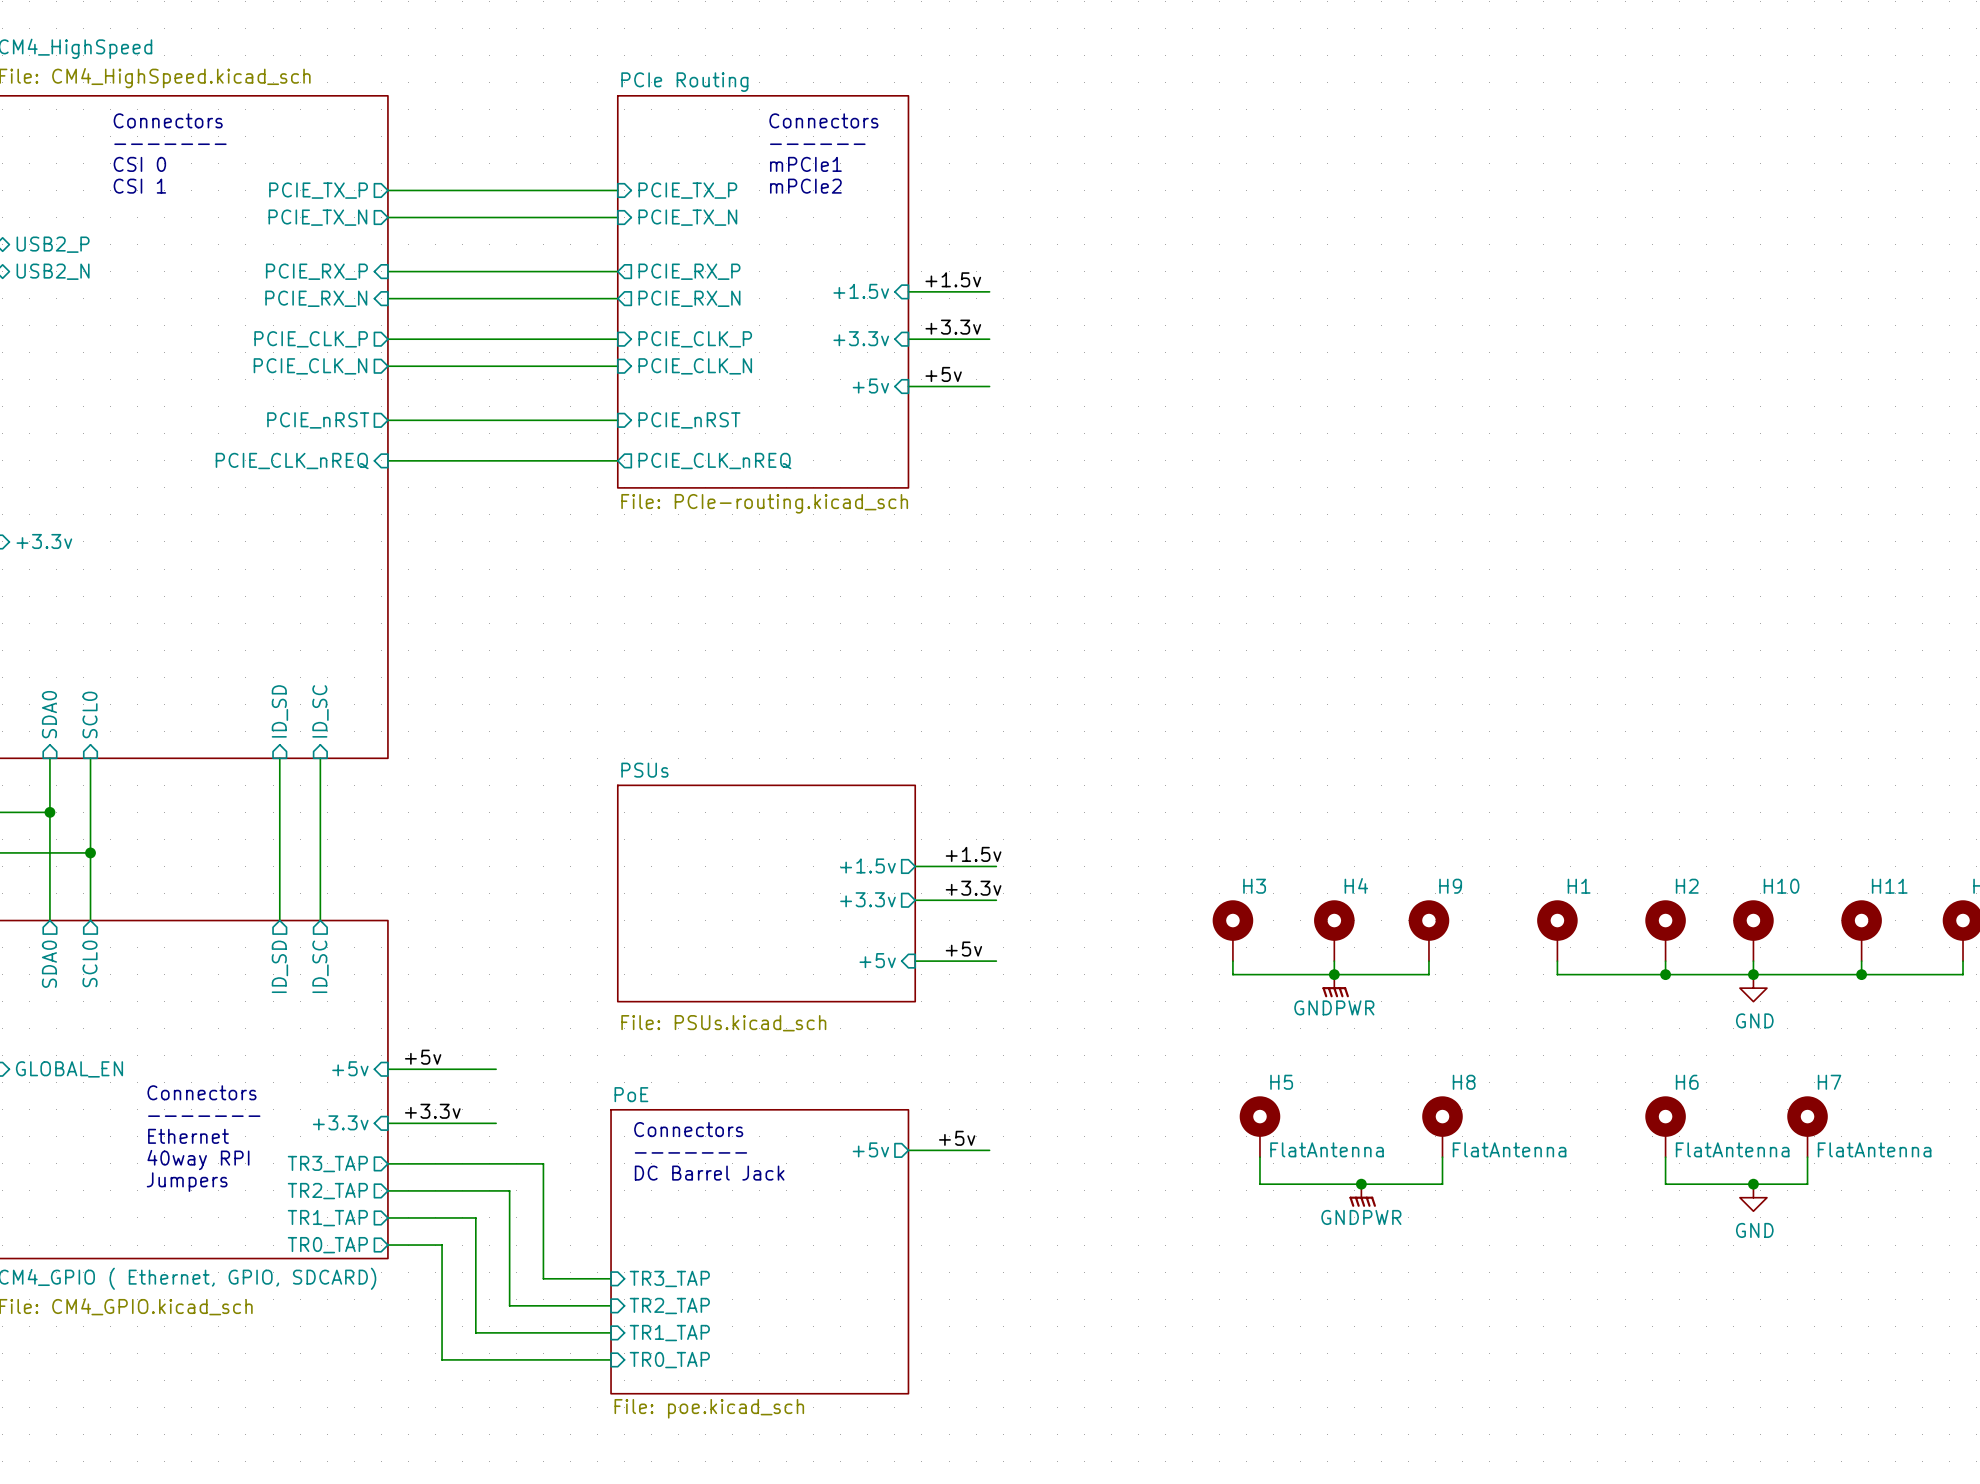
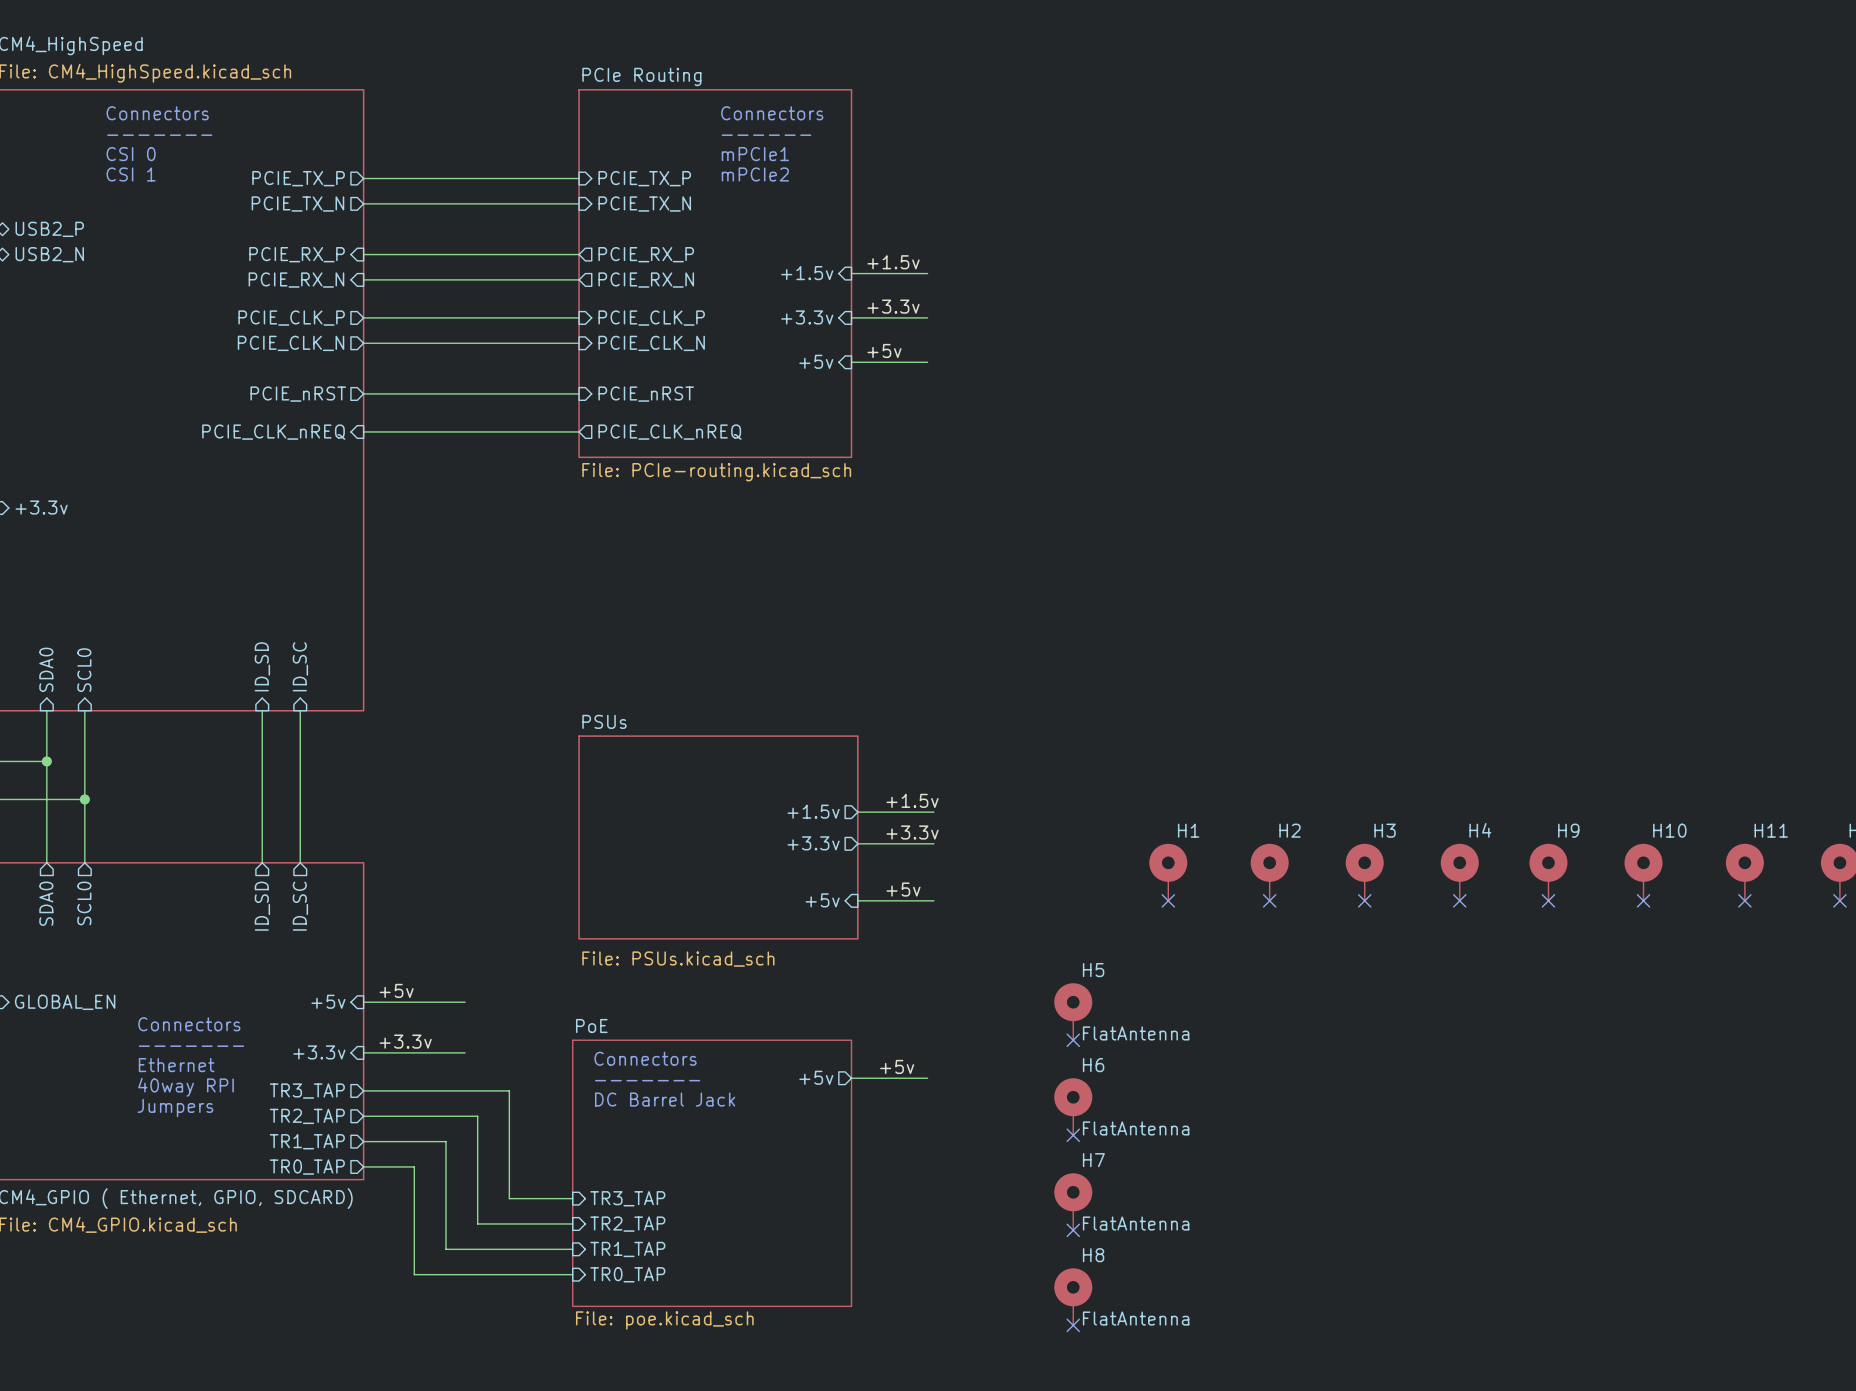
H1 name: H1 (1579, 886) -> H4 (1480, 830)
H3 position: (1232, 930) -> (1364, 872)
H1: none -> (1168, 872)
H4: (1334, 930) -> none
H9 position: (1428, 930) -> (1548, 872)
H2 position: (1665, 930) -> (1269, 872)
wire: (1232, 961) (1232, 974) (1428, 974) (1428, 961) -> none
no-connect mark: none -> (1168, 900)
wire: (1334, 961) (1334, 974) -> none
no-connect mark: none -> (1269, 900)
no-connect mark: none -> (1364, 900)
wire: (1557, 961) (1557, 974) (1963, 974) (1963, 961) -> none
no-connect mark: none -> (1459, 900)
no-connect mark: none -> (1548, 900)
wire: (1665, 961) (1665, 974) -> none
wire: (1753, 961) (1753, 974) -> none
no-connect mark: none -> (1643, 900)
wire: (1861, 961) (1861, 974) -> none
no-connect mark: none -> (1744, 900)
no-connect mark: none -> (1839, 900)
junction: (1334, 974) -> none
junction: (1665, 974) -> none
junction: (1753, 974) -> none
junction: (1861, 974) -> none
power symbol: GNDPWR (1335, 985) -> none
power symbol: GND (1753, 988) -> none
no-connect mark: none -> (1073, 1040)
H5 position: (1259, 1126) -> (1073, 1011)
H8 position: (1442, 1126) -> (1073, 1296)
H6 position: (1665, 1126) -> (1073, 1106)
H7 position: (1807, 1126) -> (1073, 1201)
wire: (1259, 1157) (1259, 1184) (1442, 1184) (1442, 1157) -> none
wire: (1665, 1157) (1665, 1184) (1807, 1184) (1807, 1157) -> none
junction: (1361, 1184) -> none
junction: (1753, 1184) -> none
power symbol: GNDPWR (1362, 1195) -> none
power symbol: GND (1753, 1197) -> none
no-connect mark: none -> (1073, 1135)
no-connect mark: none -> (1073, 1230)
no-connect mark: none -> (1073, 1325)

